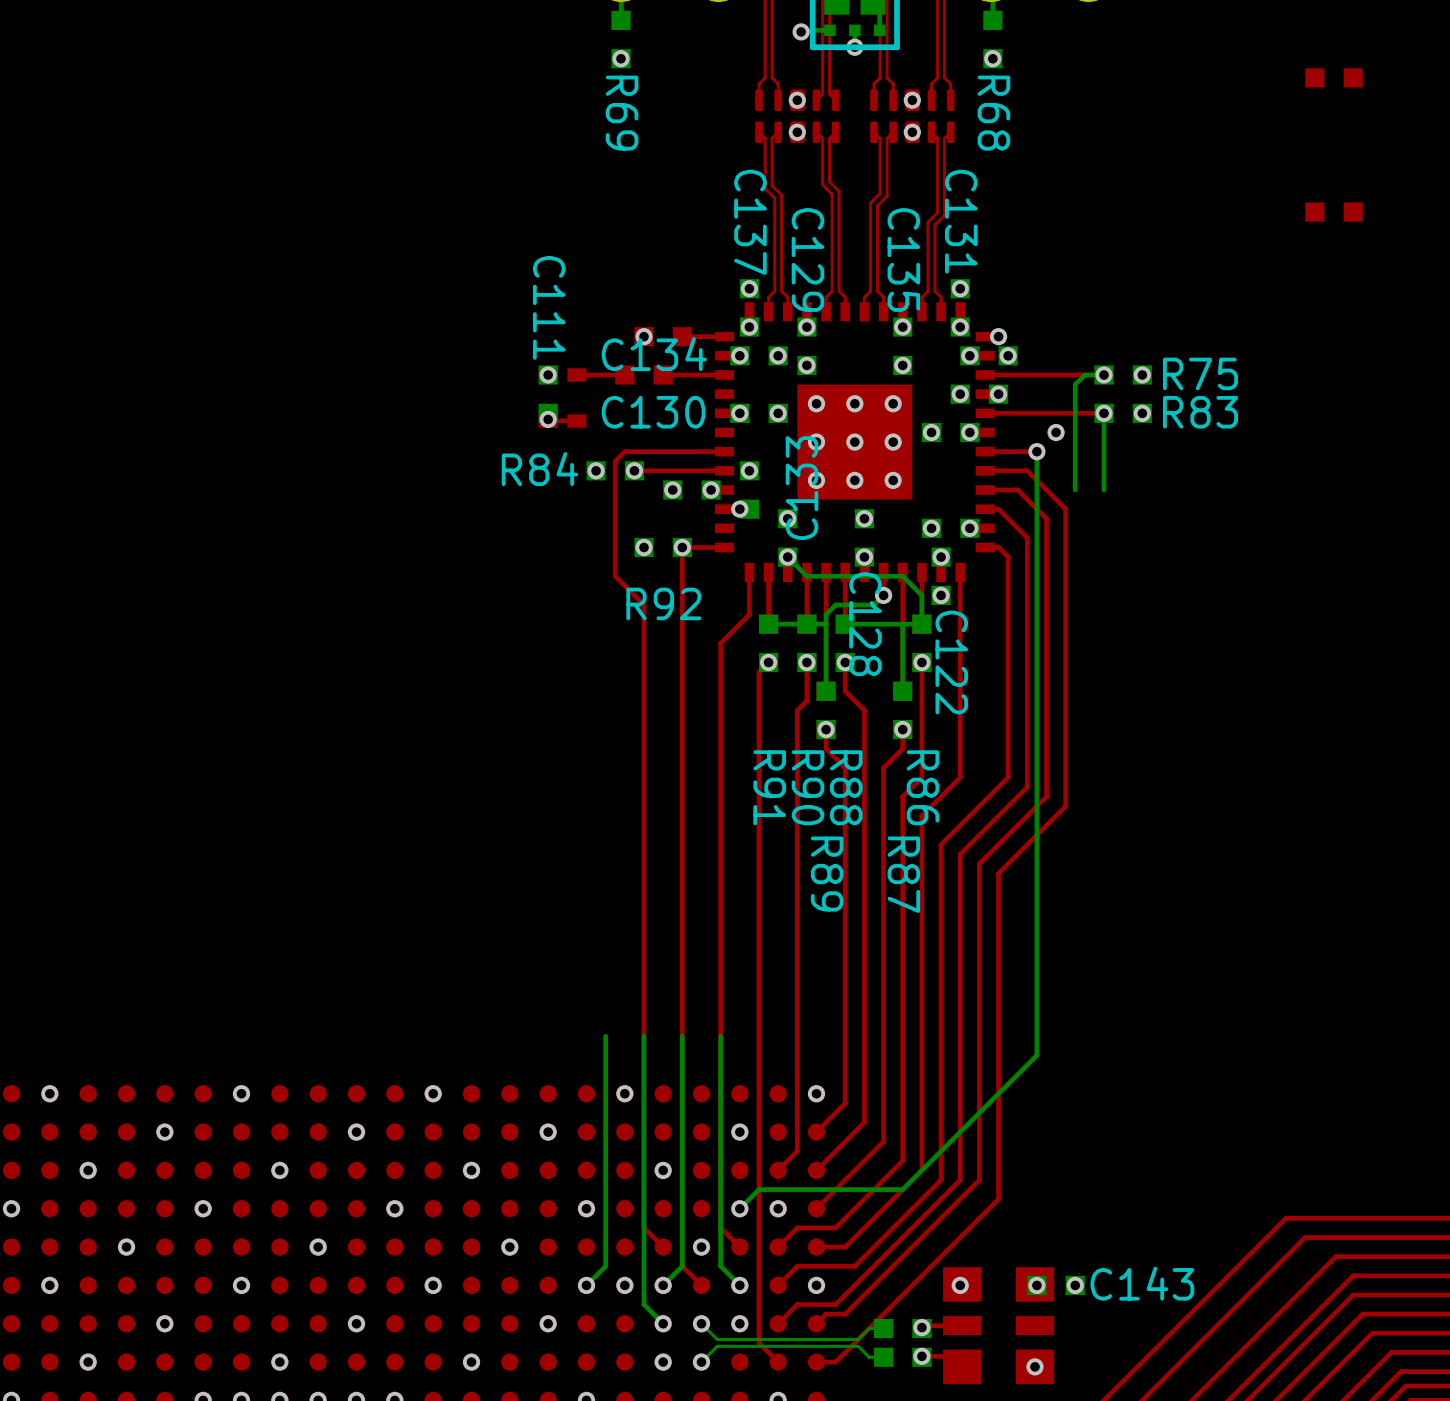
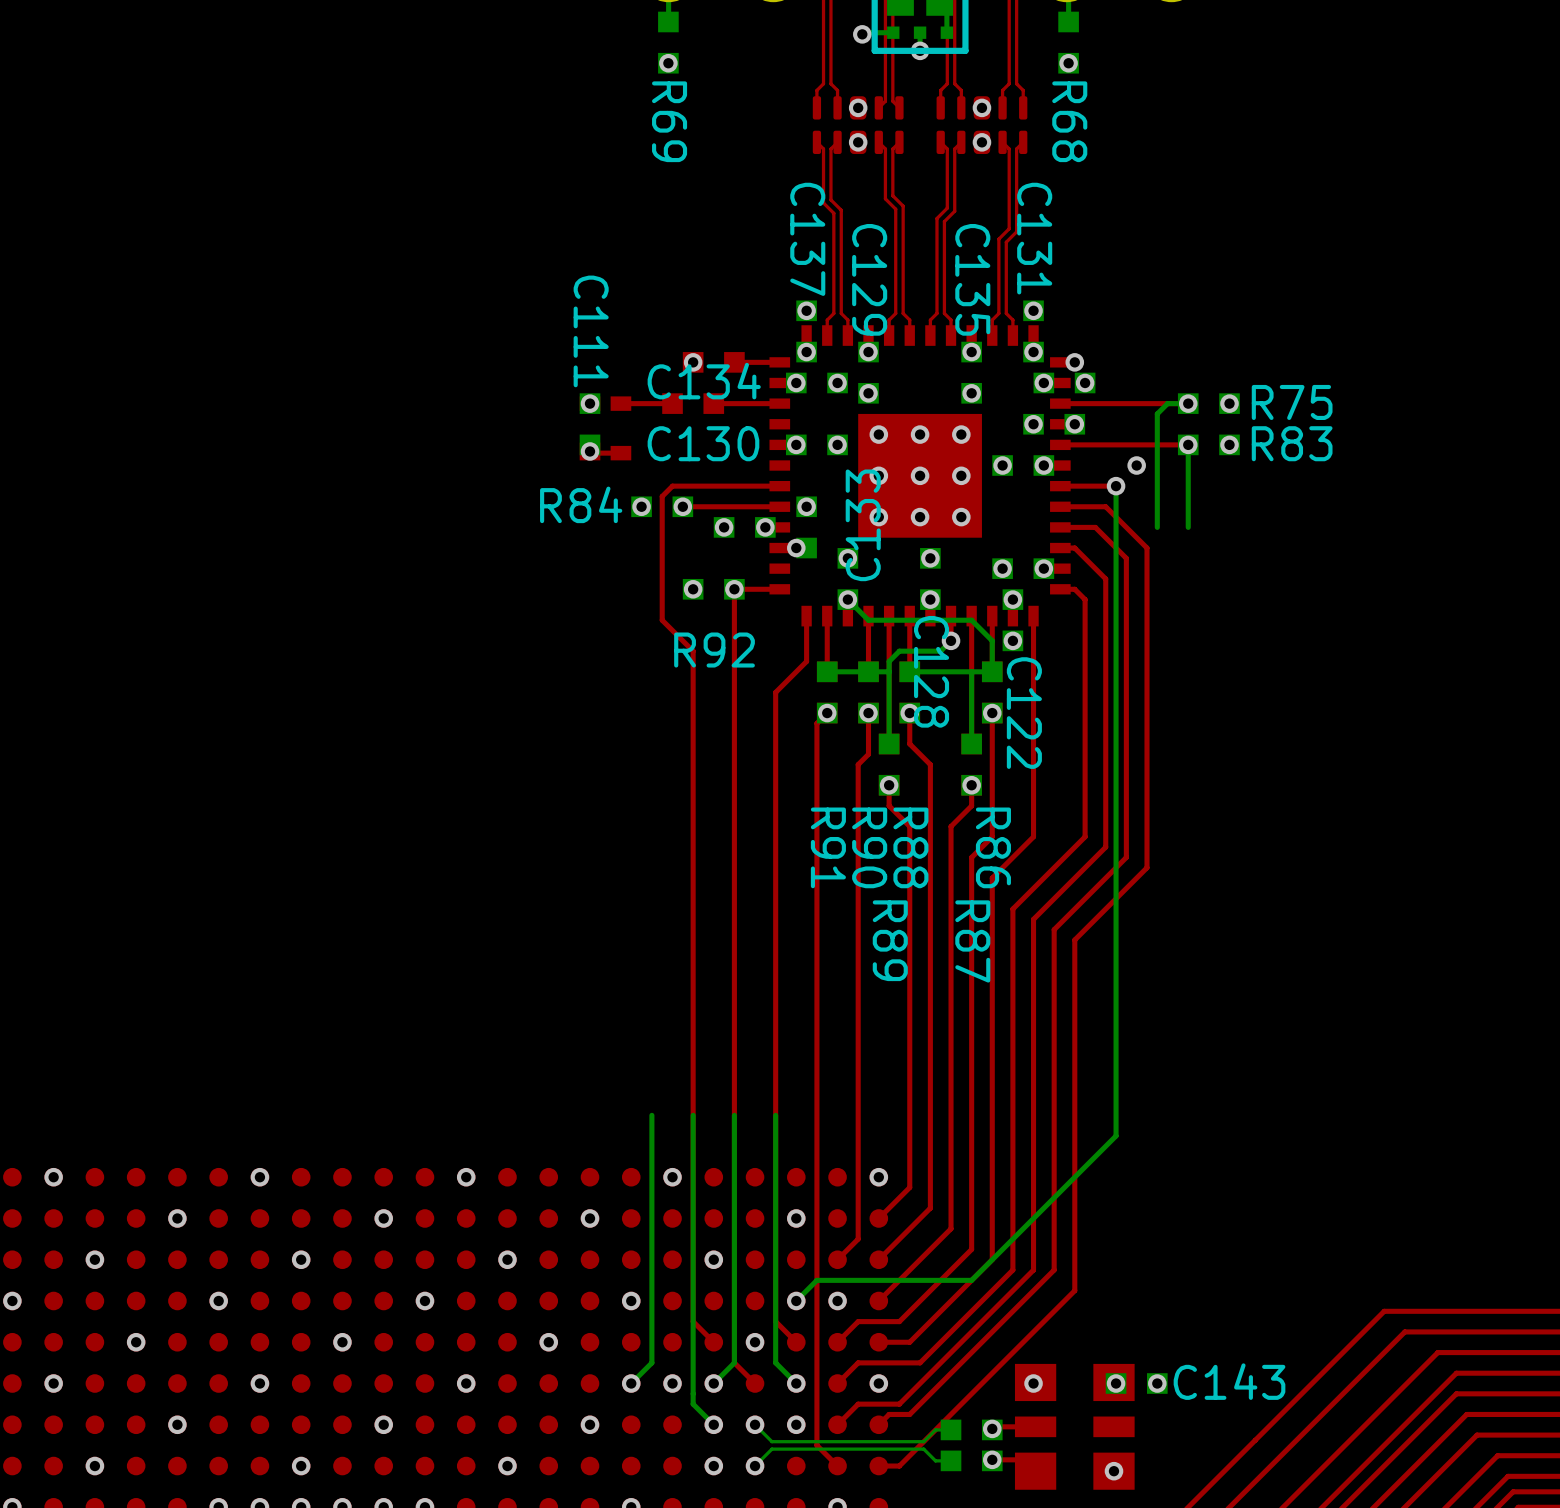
part: (1334, 77) -> none
part: (1334, 212) -> none

